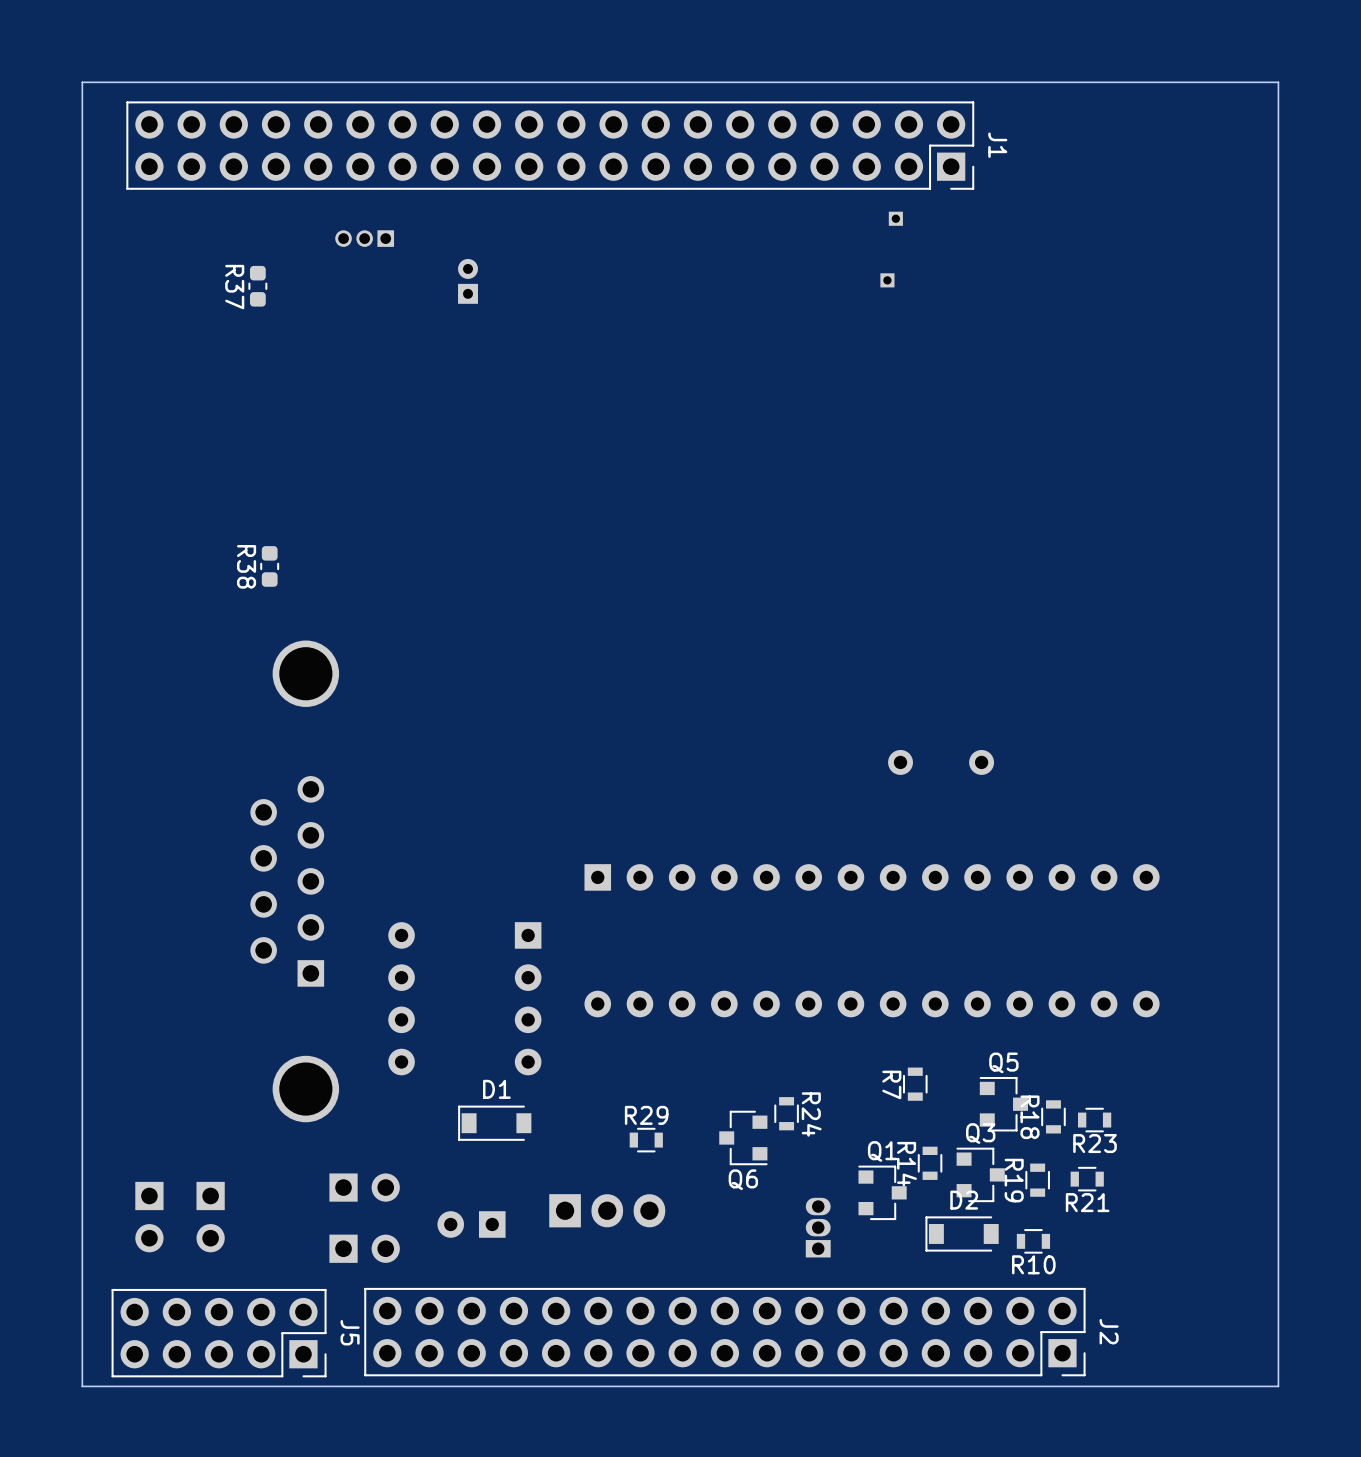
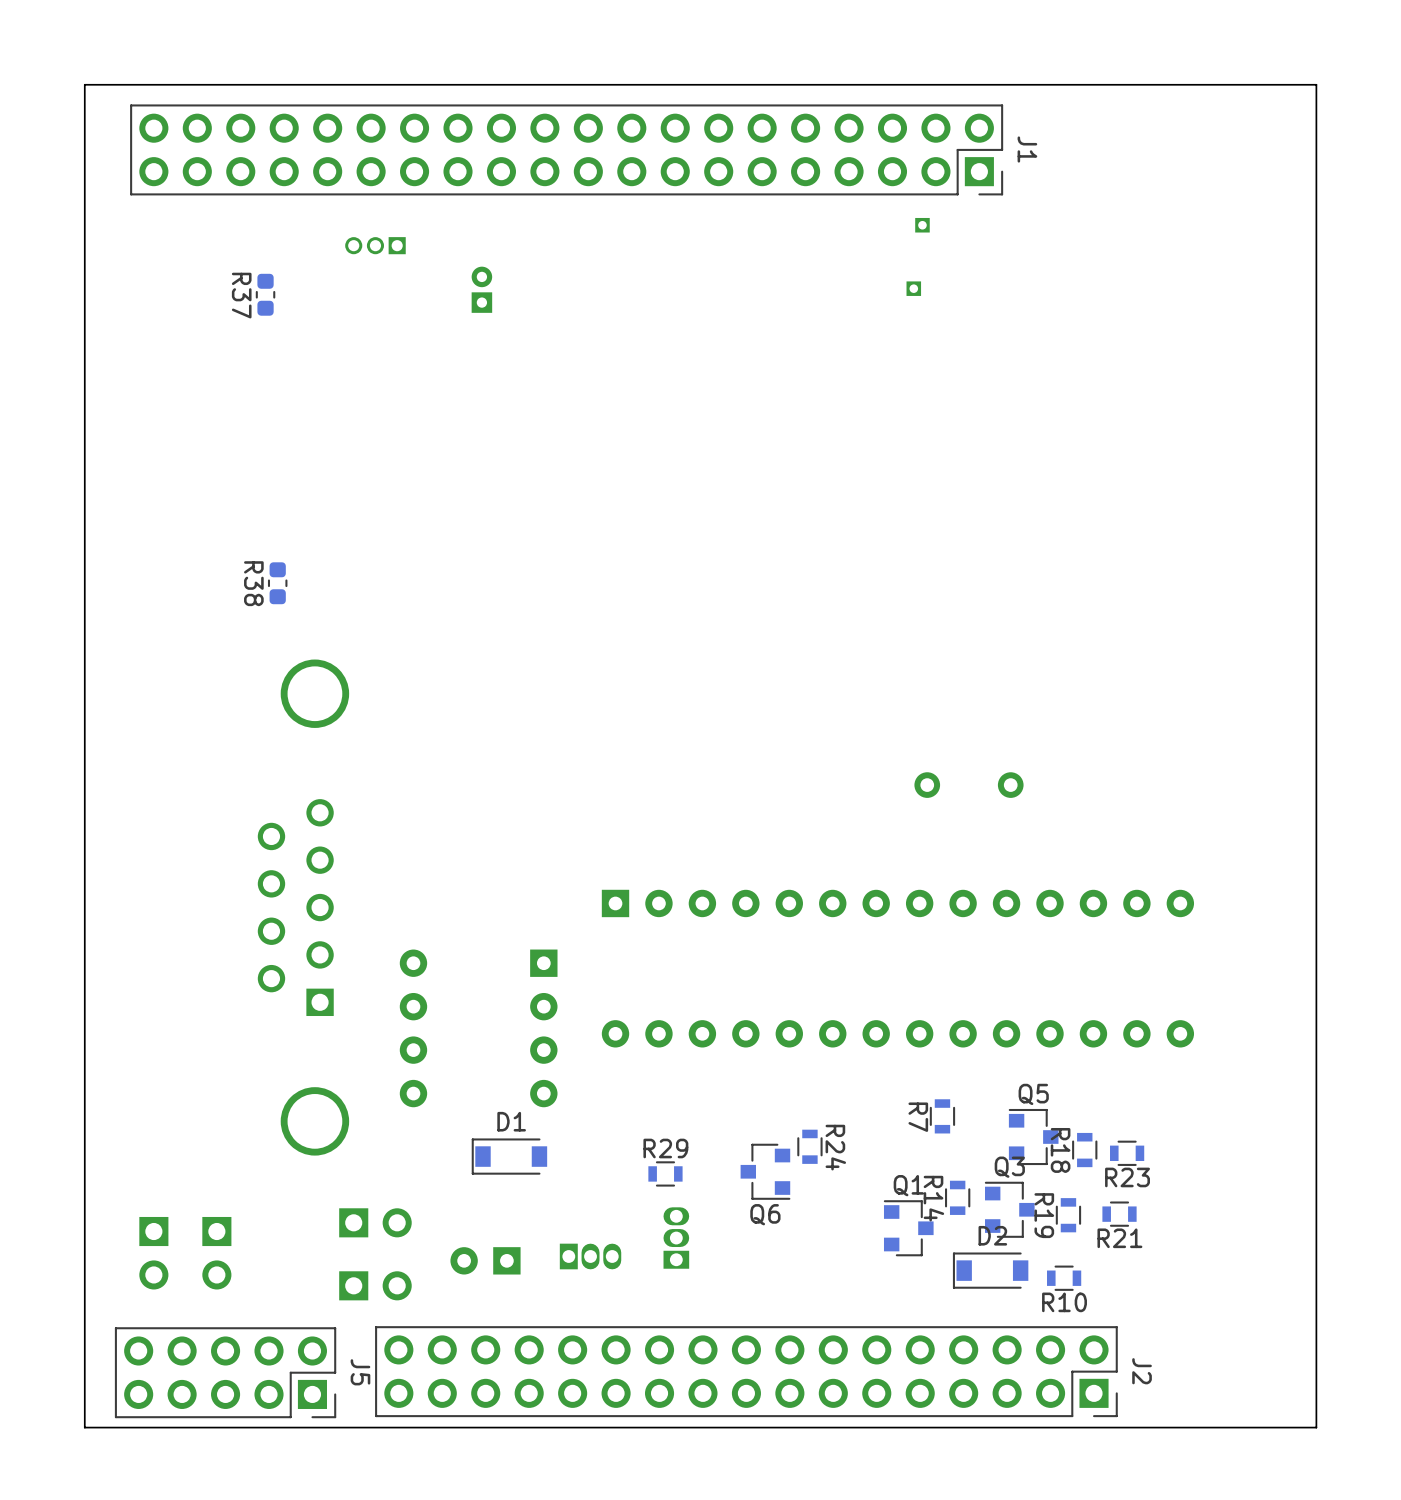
part: none -> (676, 1238)
part: (607, 1210) -> none
part: none -> (590, 1256)
part: (818, 1227) -> none

